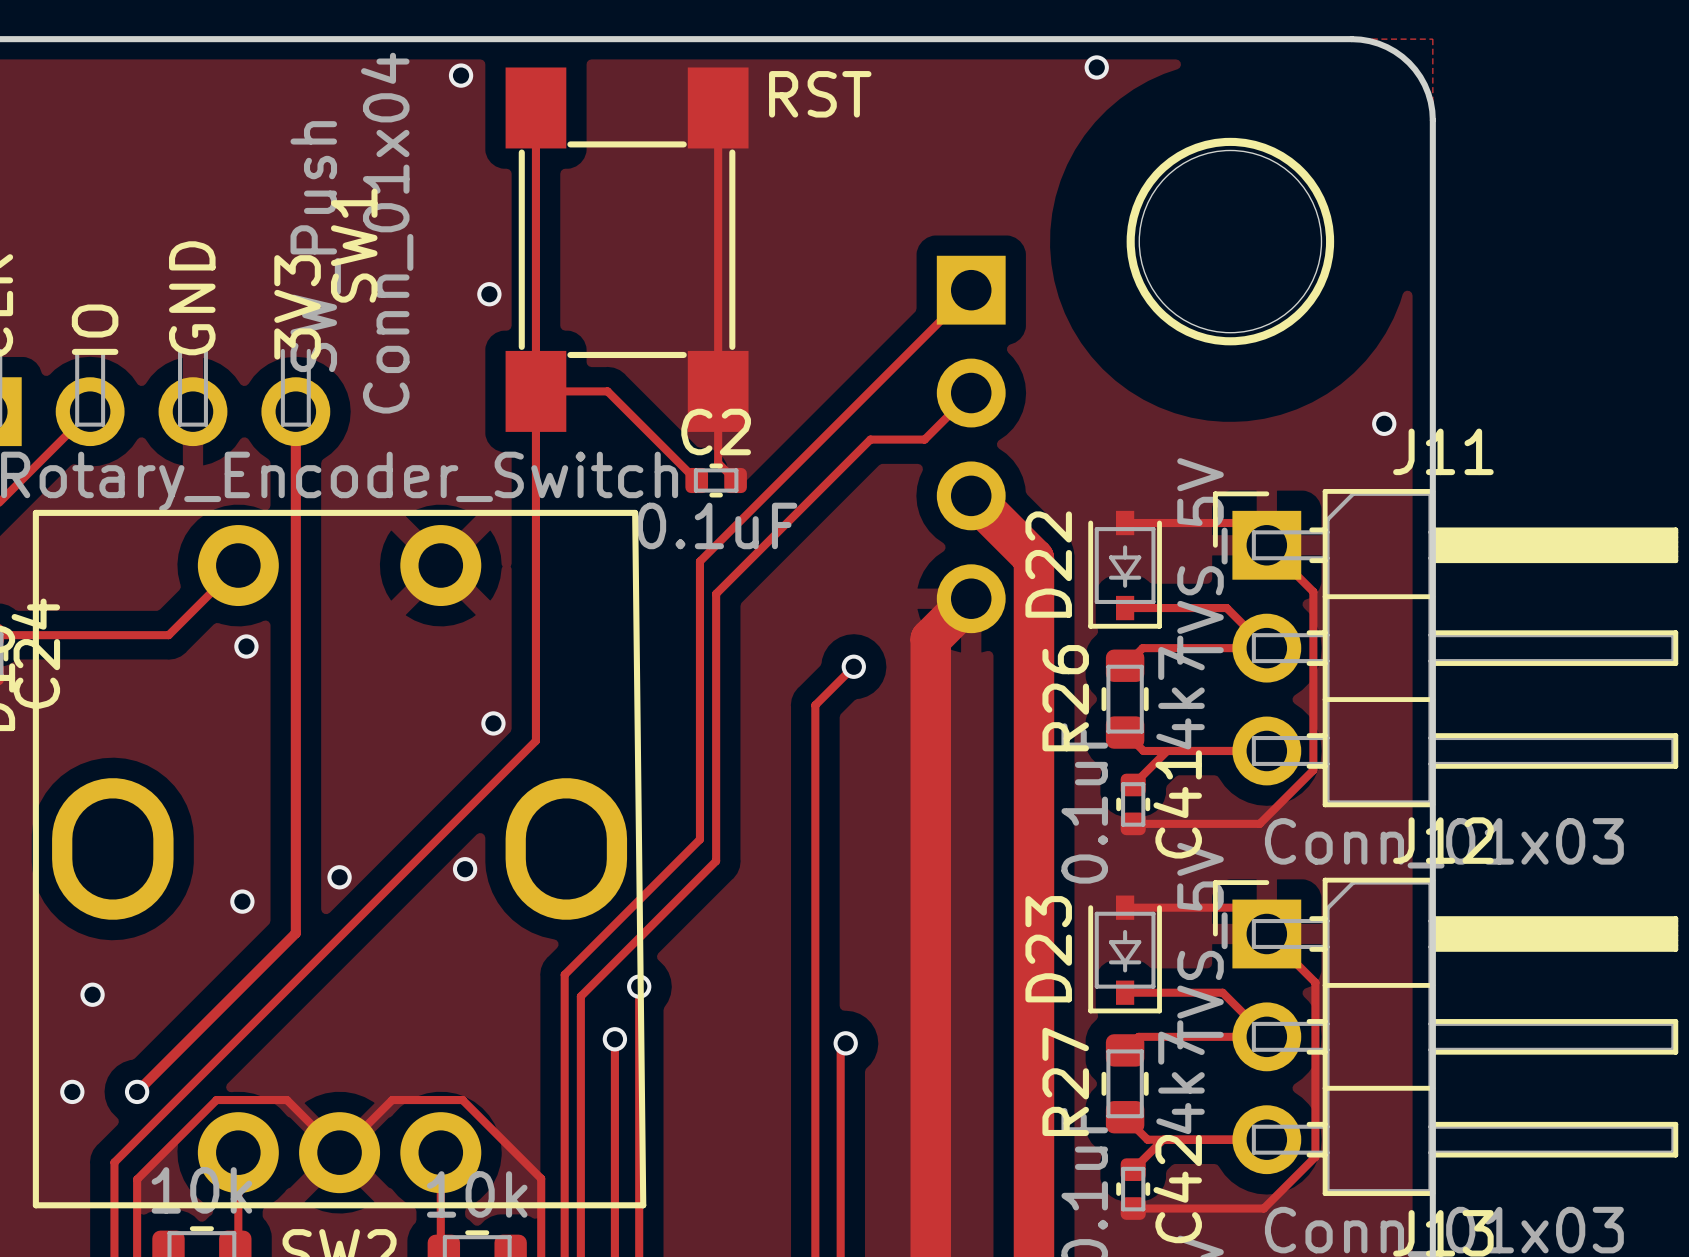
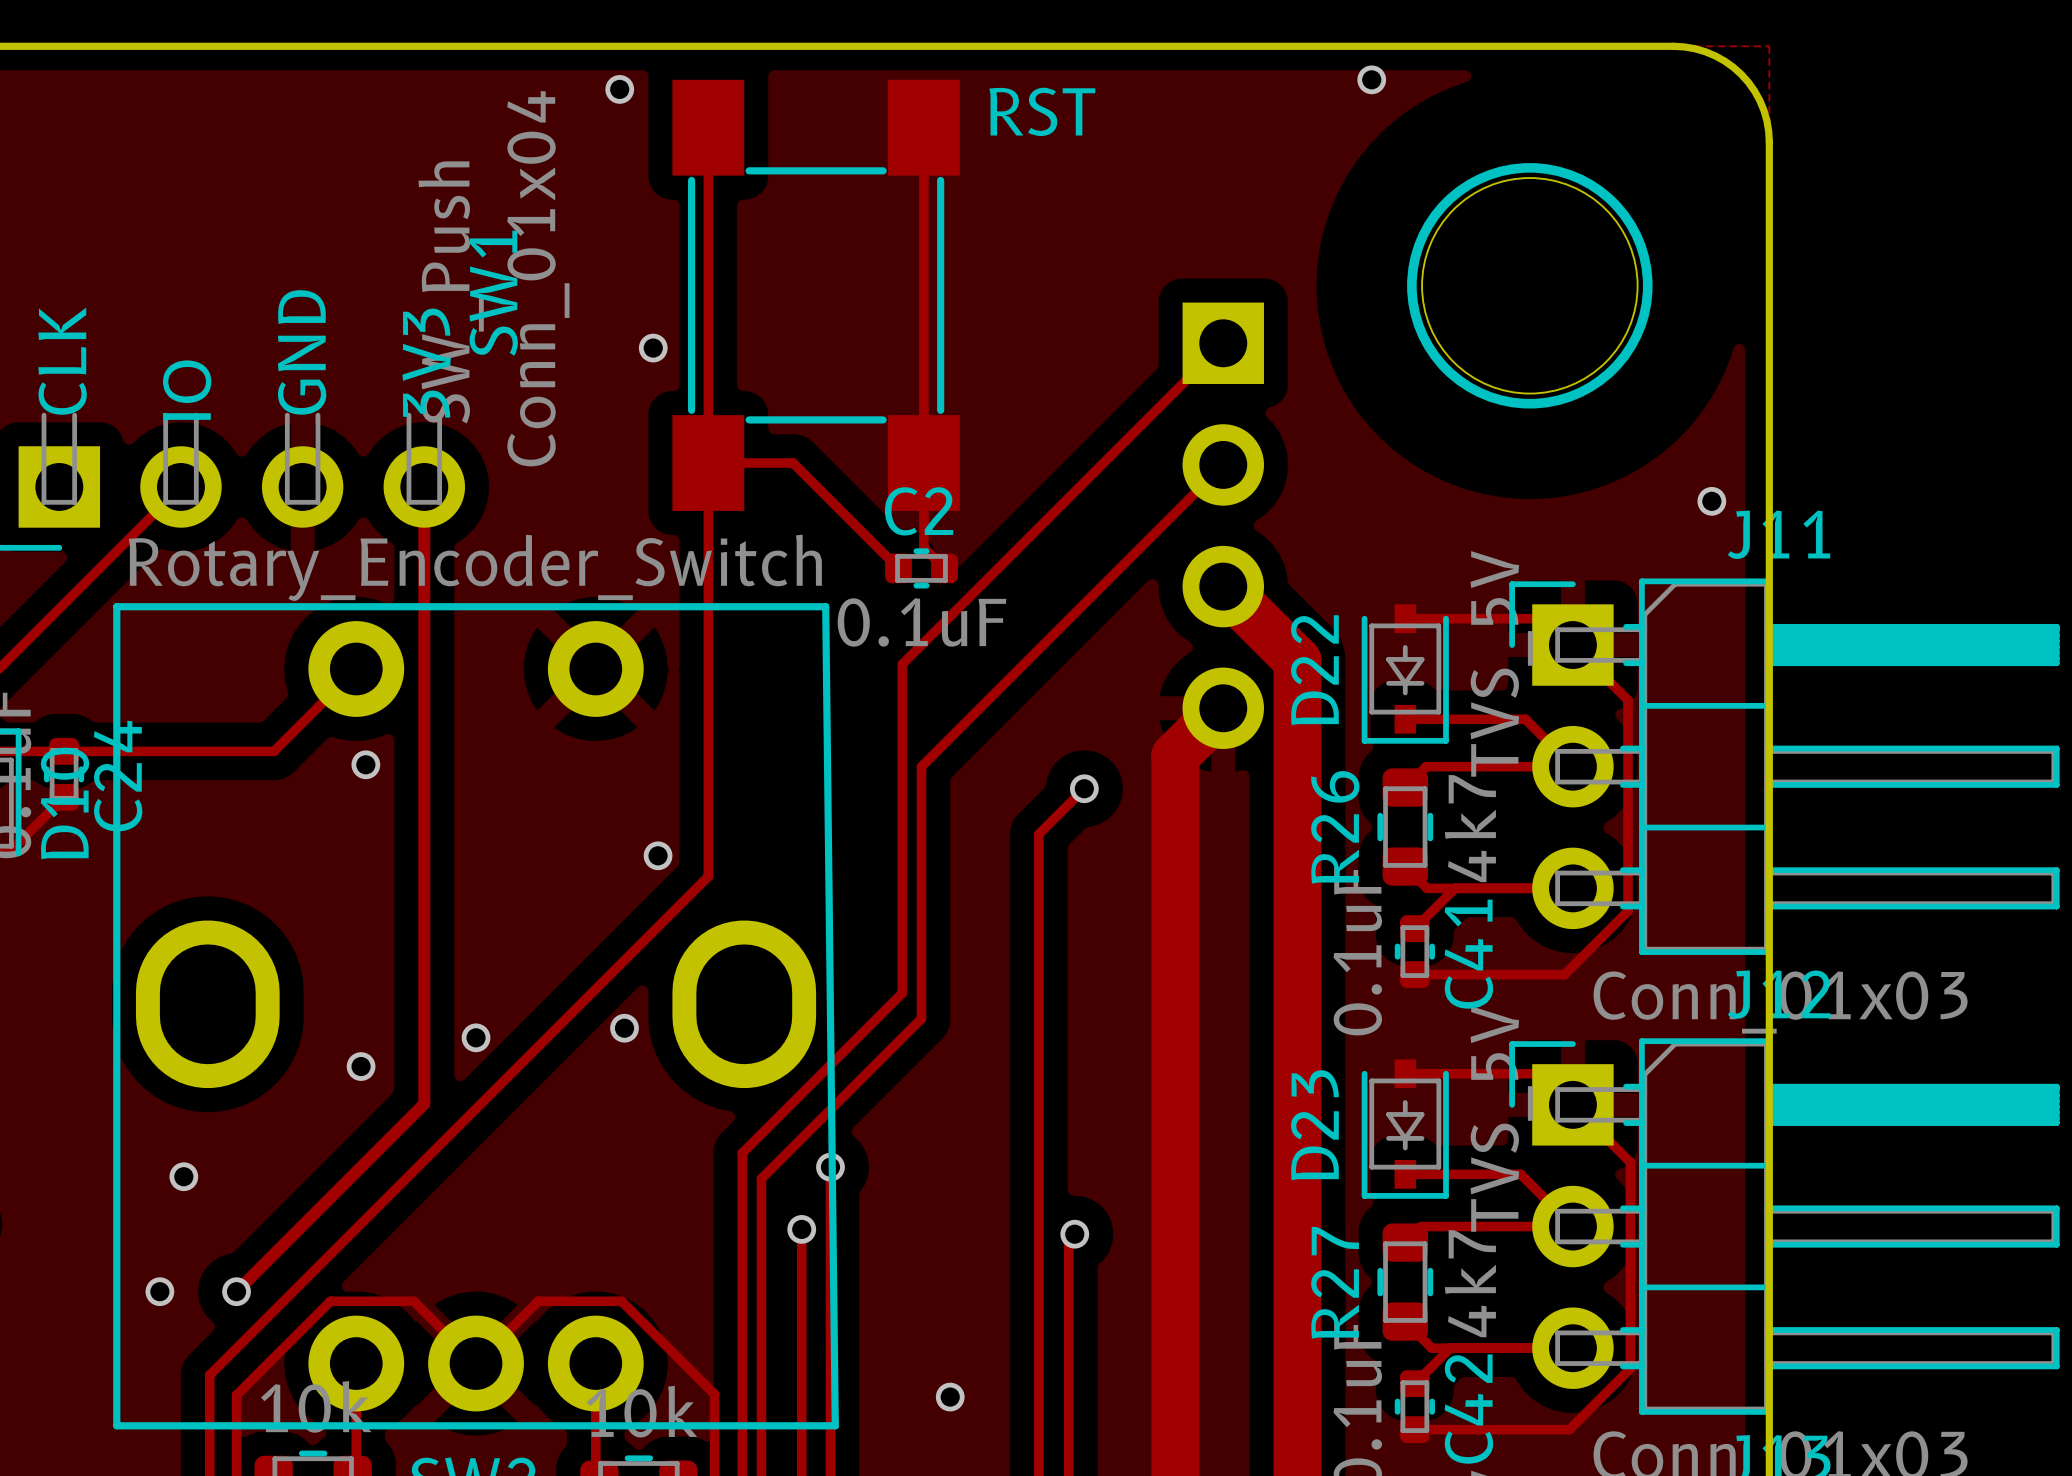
track: (924, 439) (870, 439) (716, 593) (716, 648) -> (1168, 520) (921, 766)
via: none -> (950, 1397)

